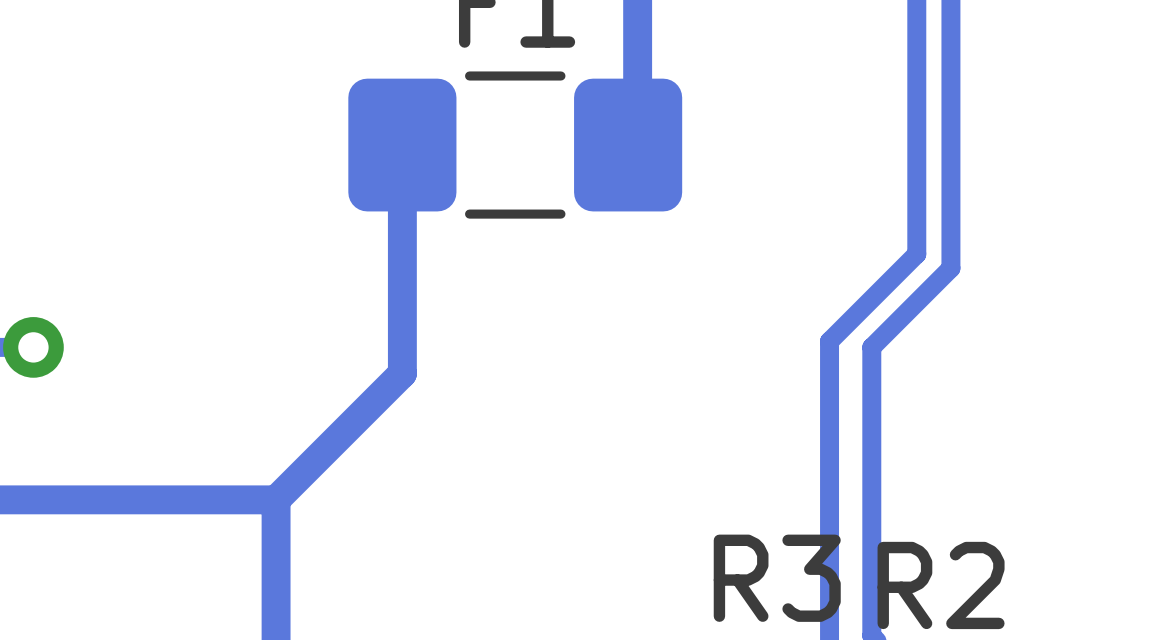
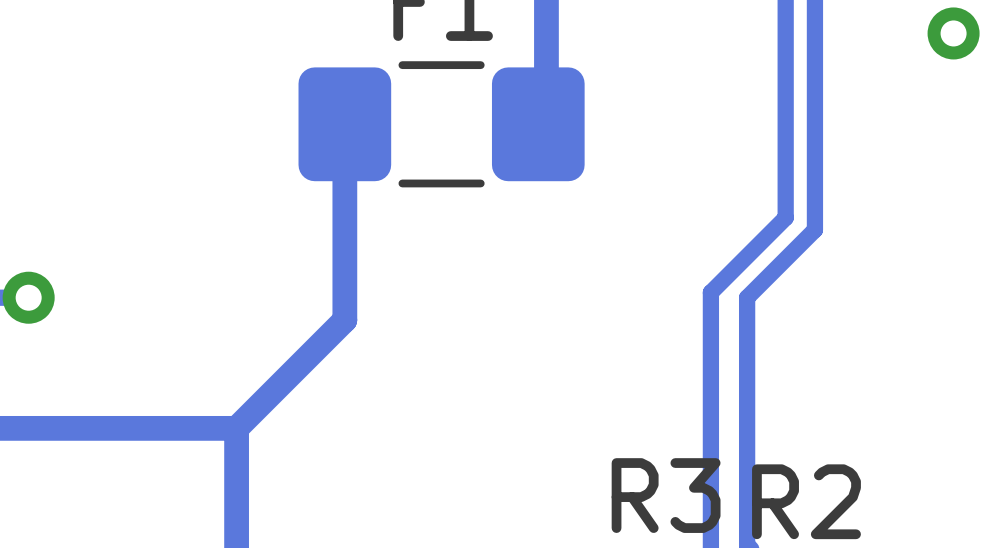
via: none -> (953, 33)

